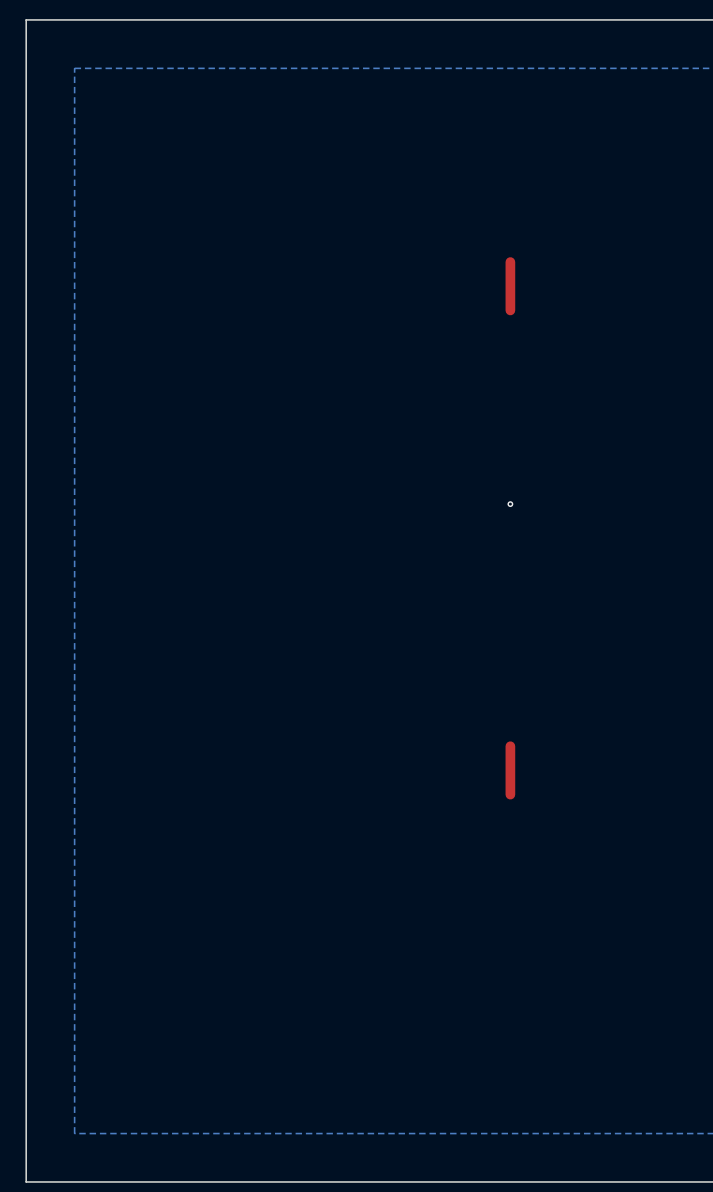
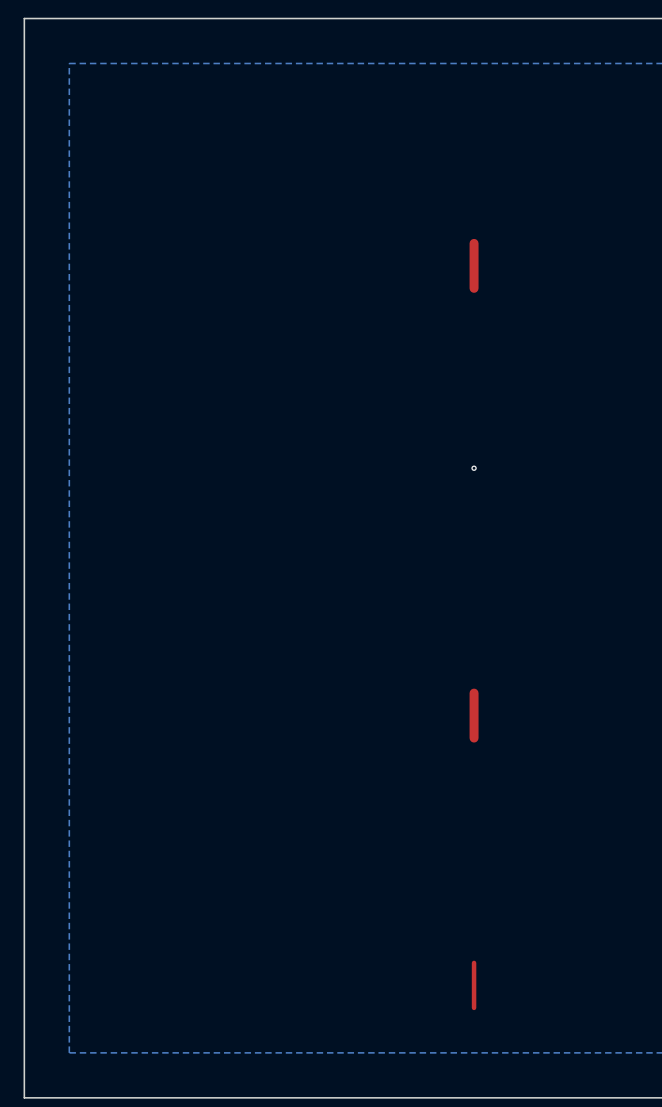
top track: none -> (474, 962) (474, 1007)

